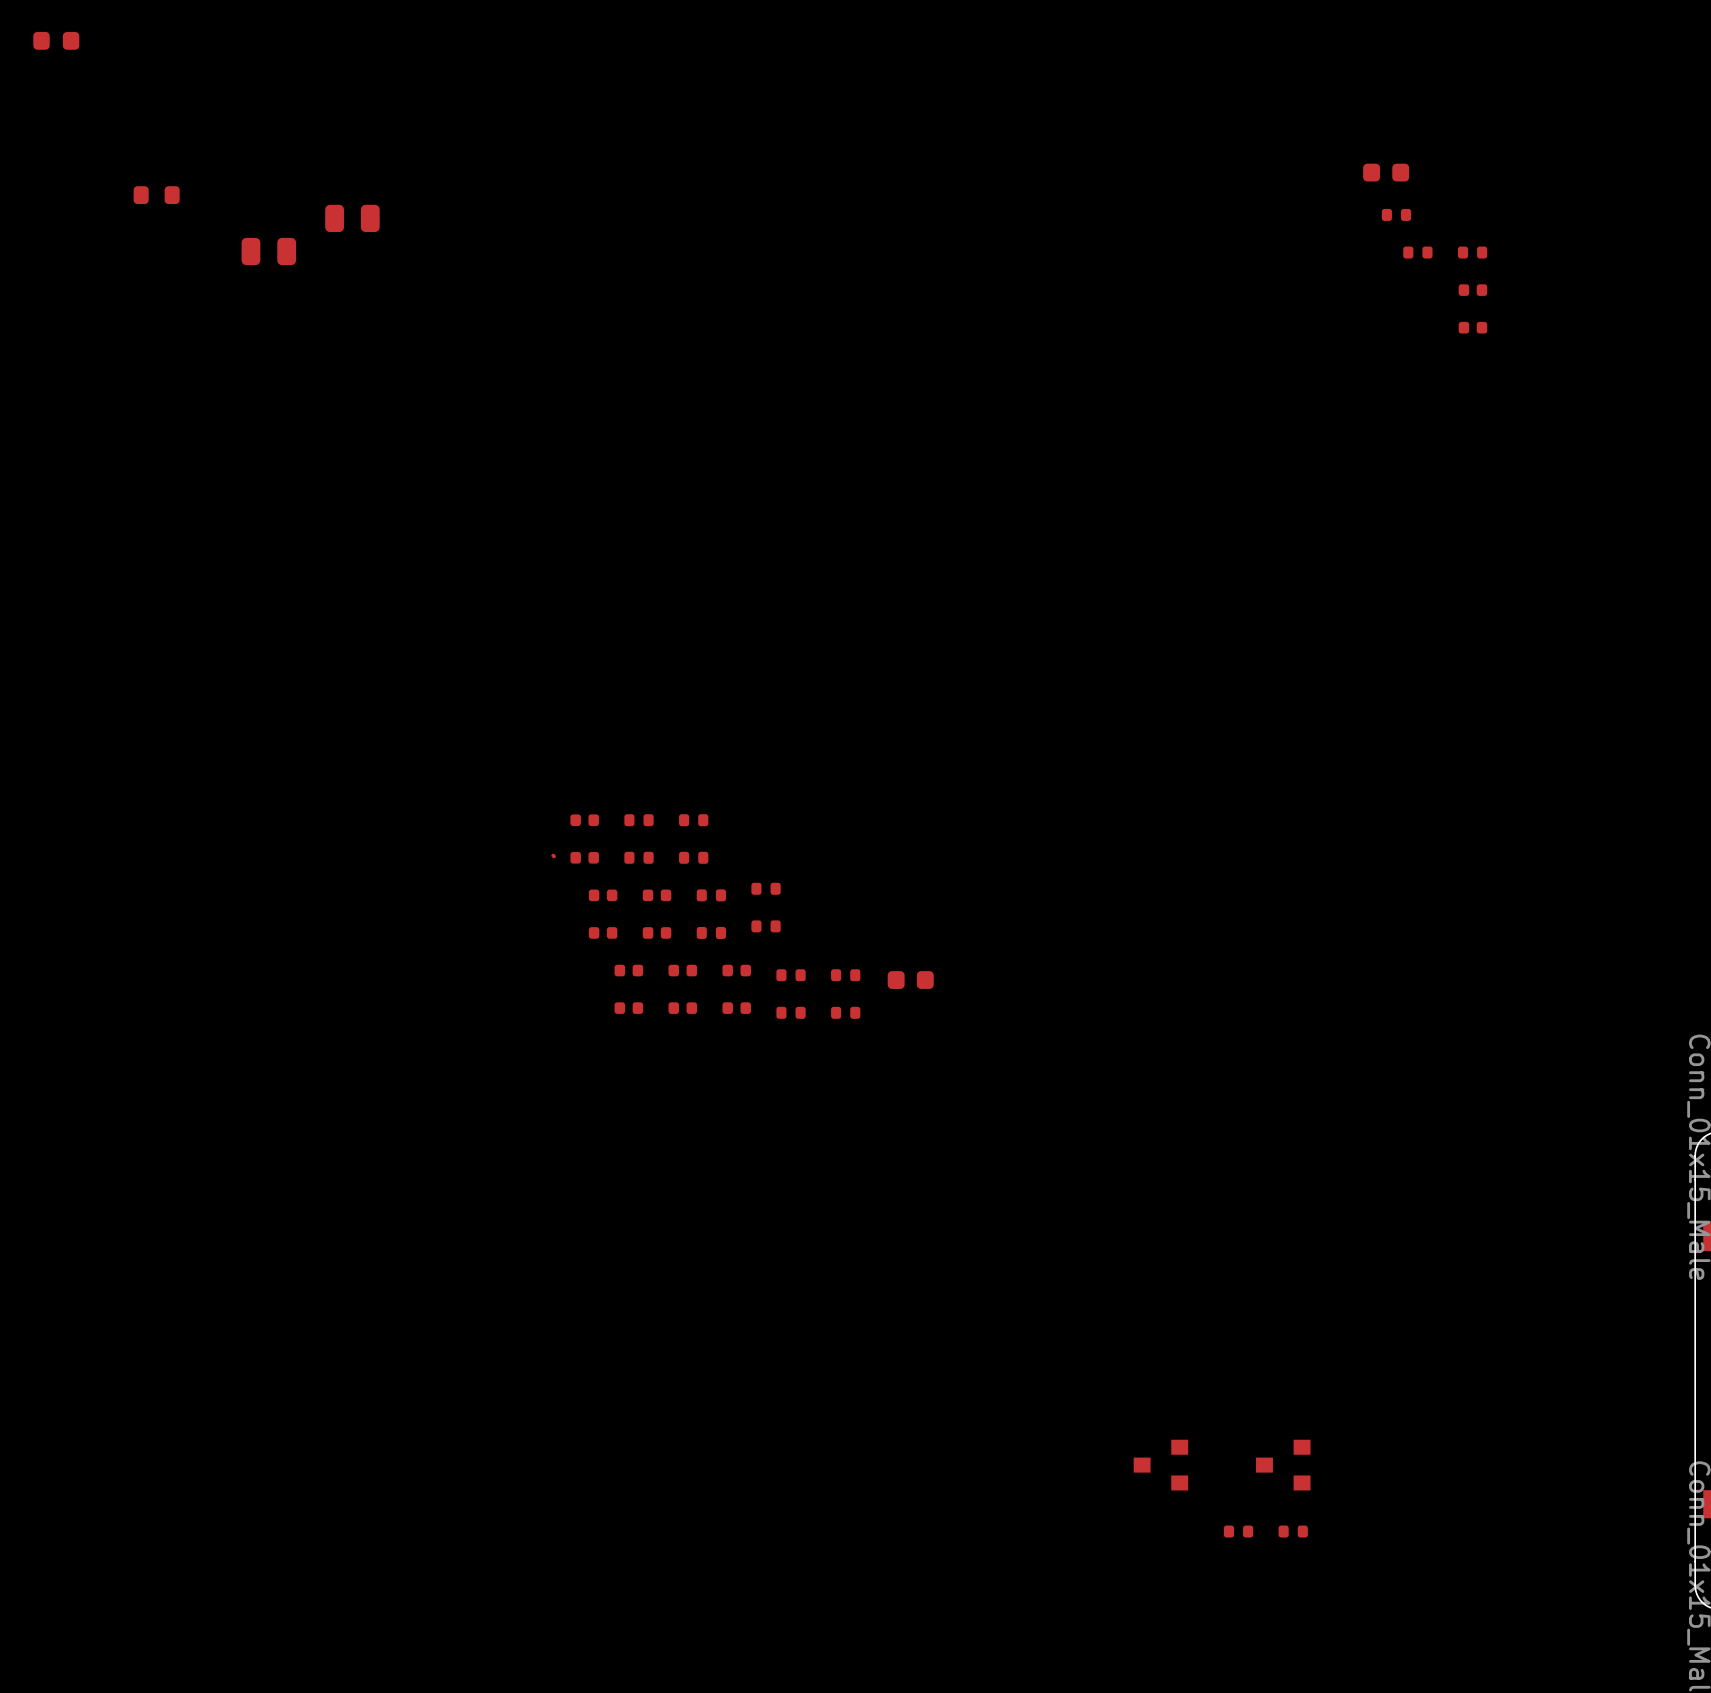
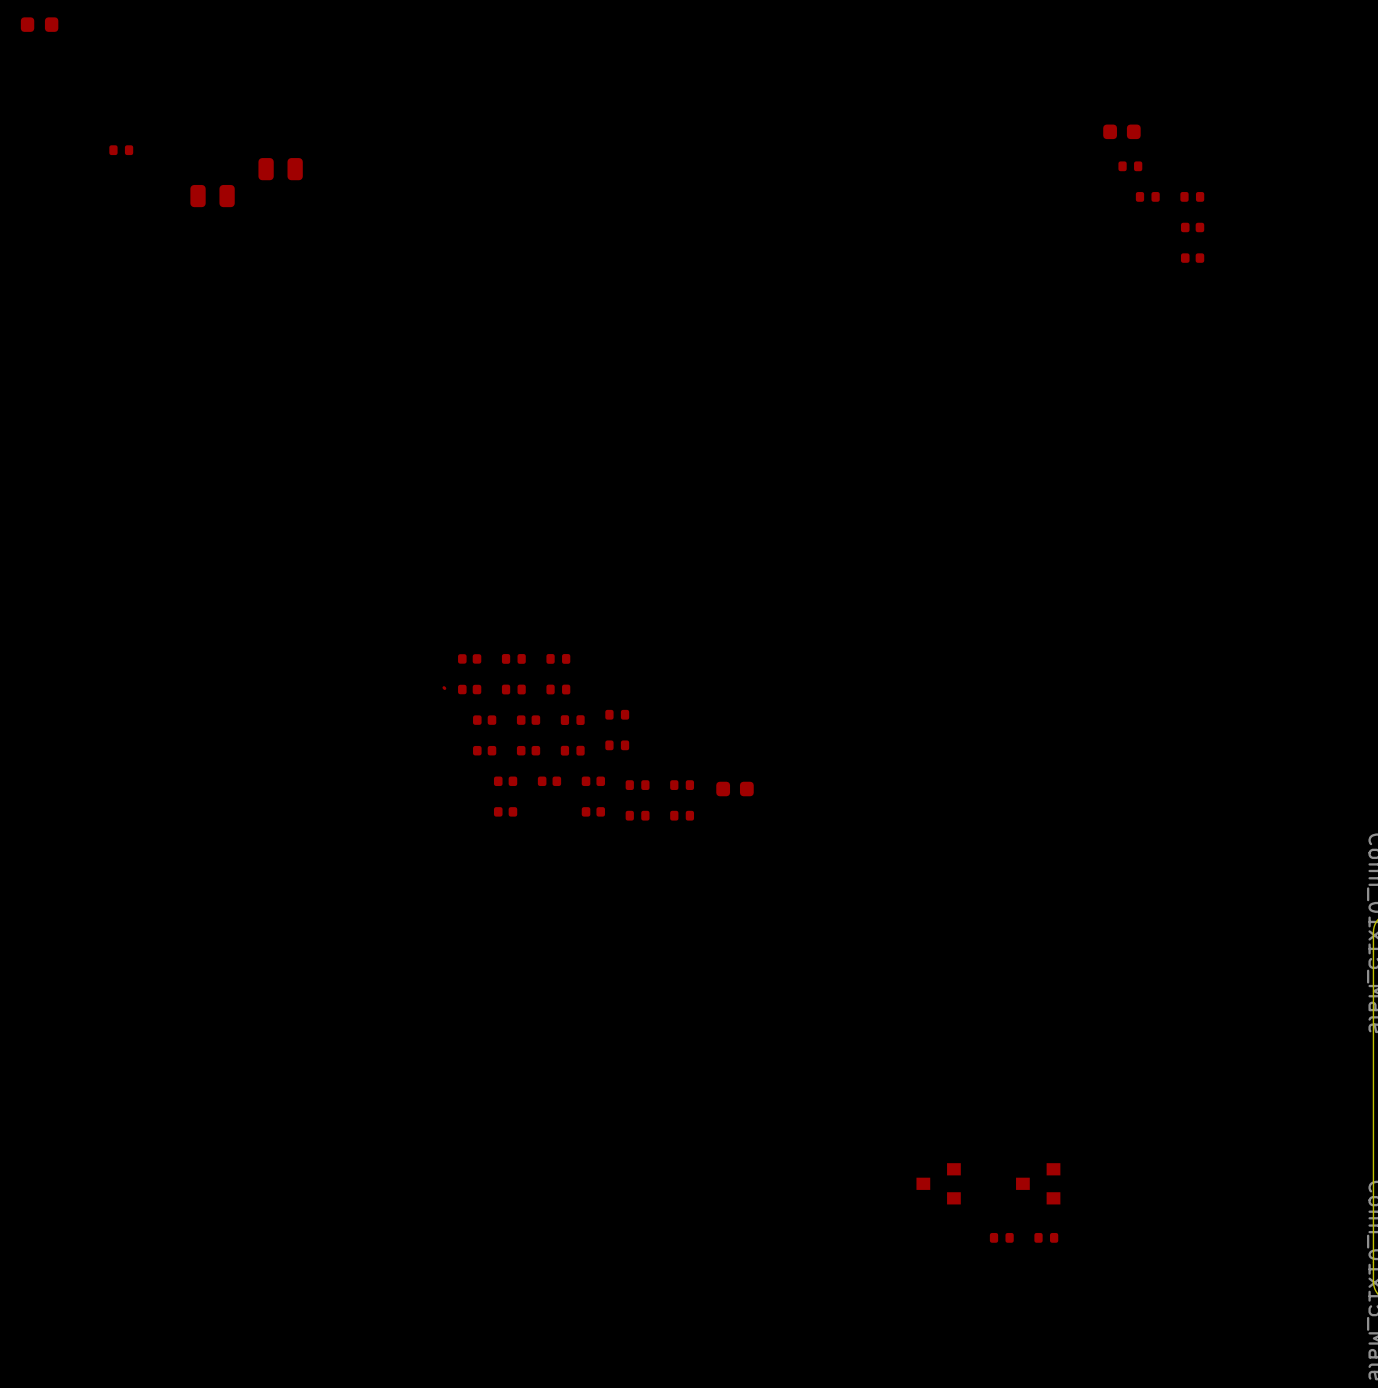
part footprint: [133, 186, 180, 205] -> [109, 145, 134, 156]
part: (682, 1008) -> none

